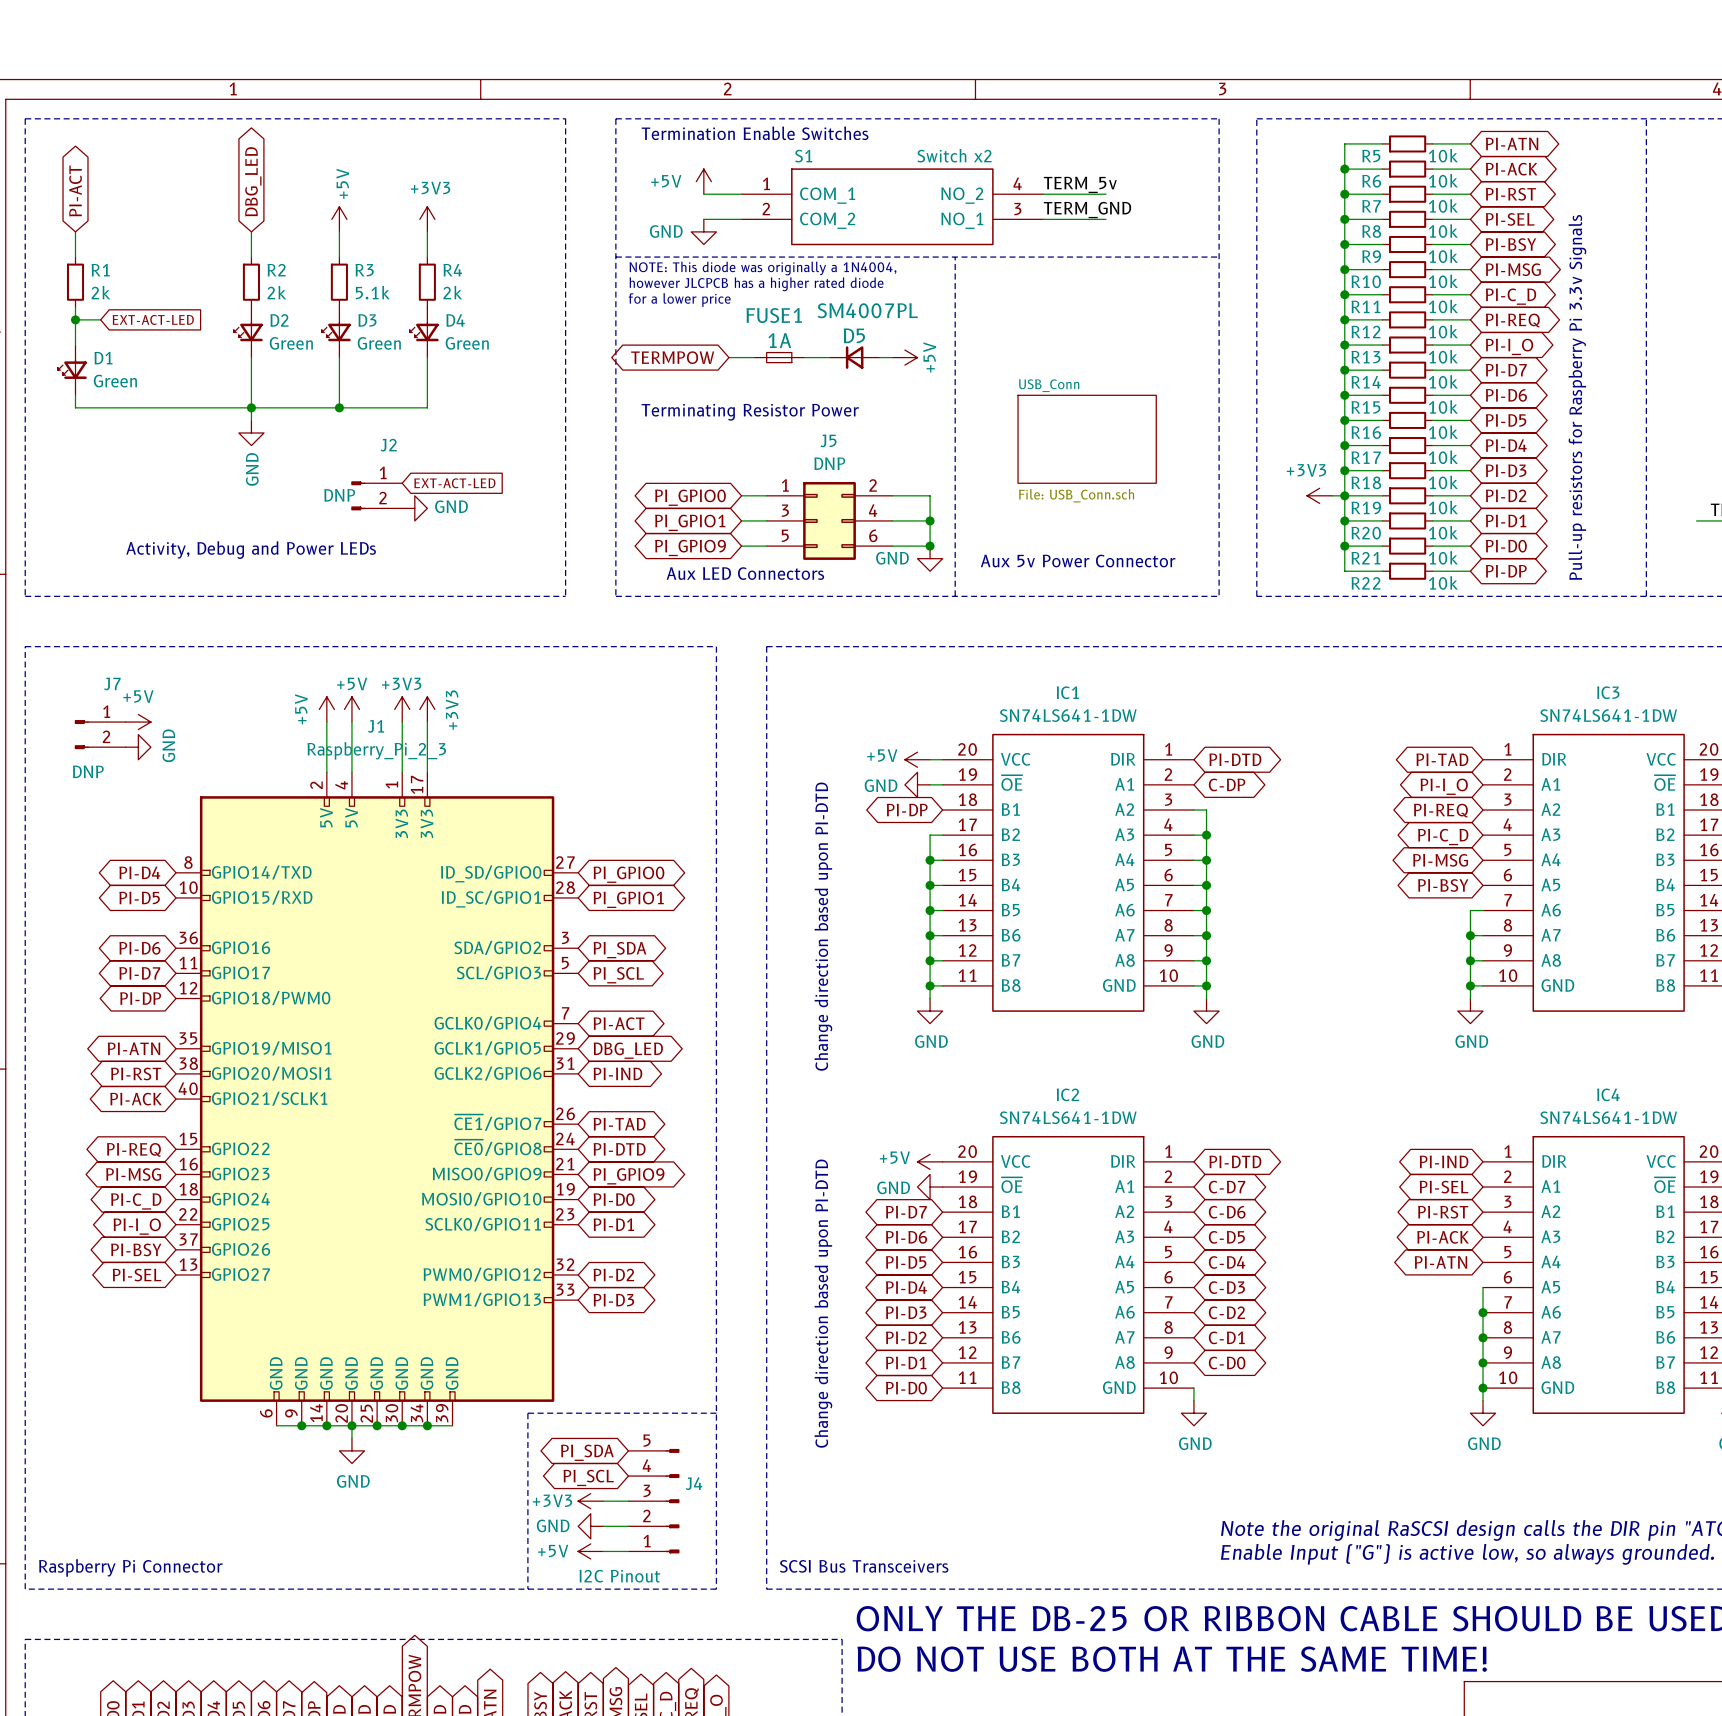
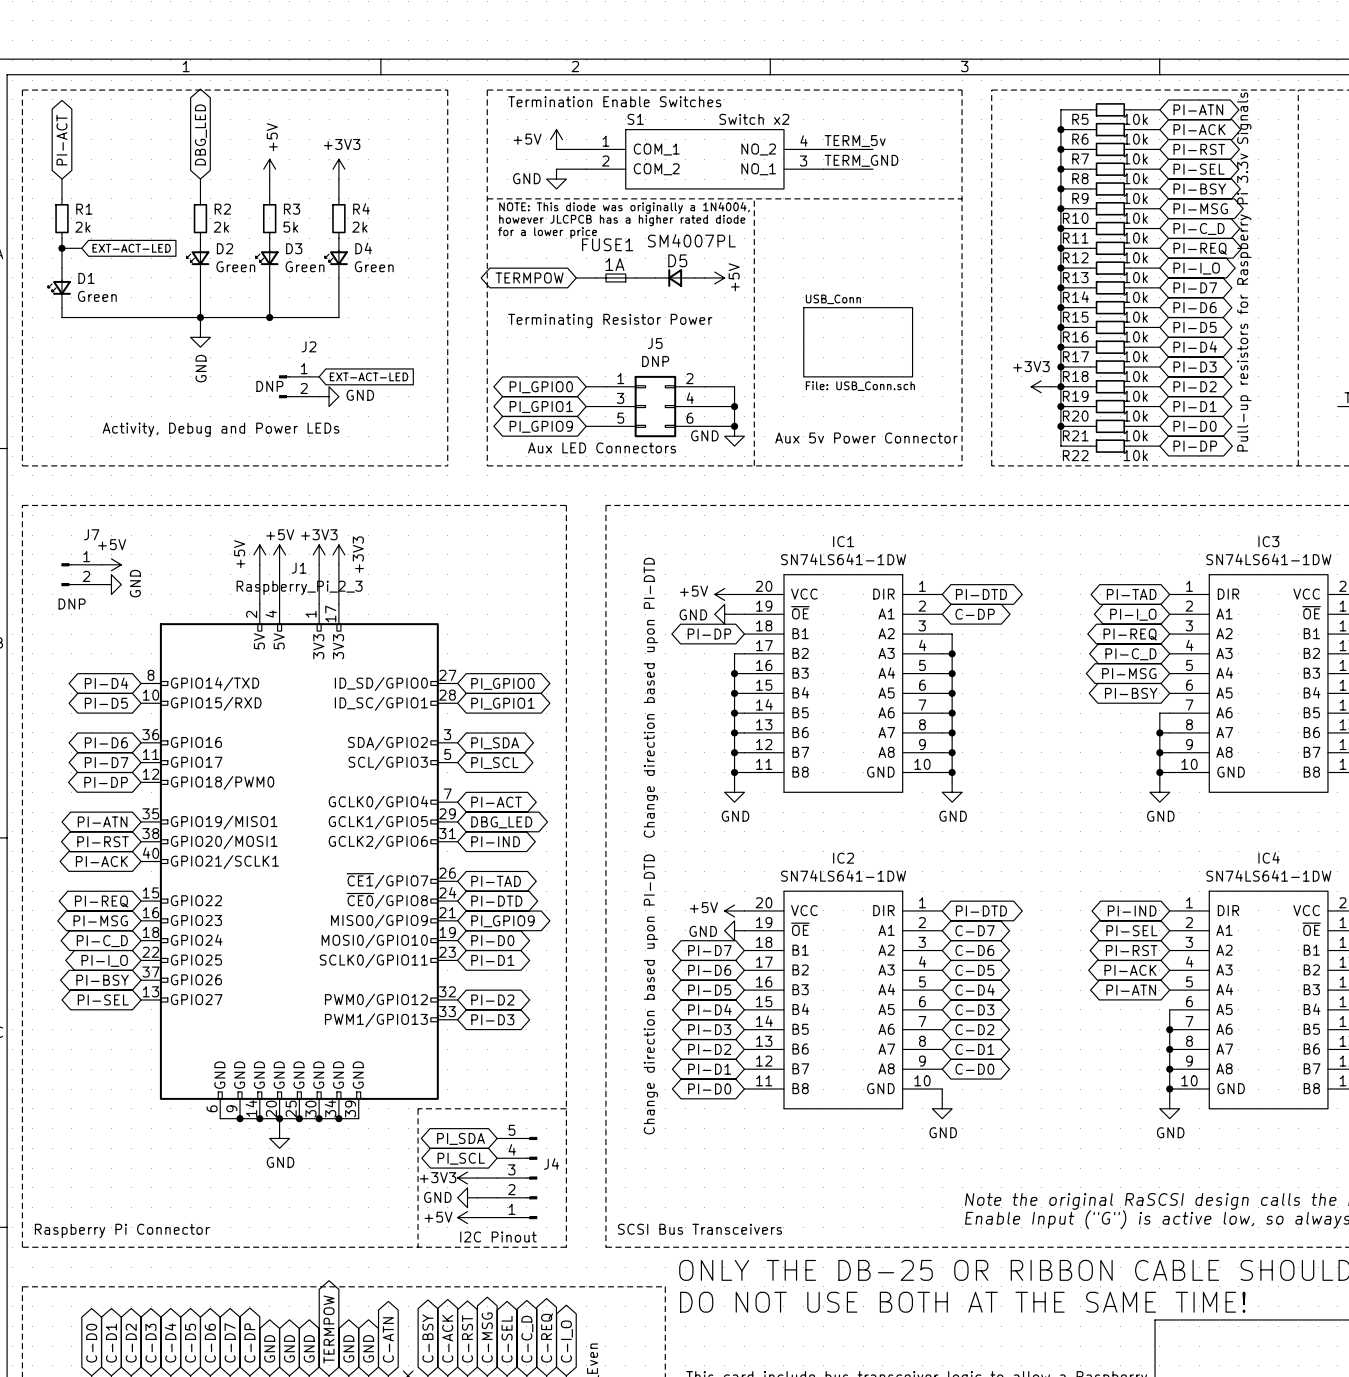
R3 value: 5.1k (372, 292) -> 5k (290, 227)

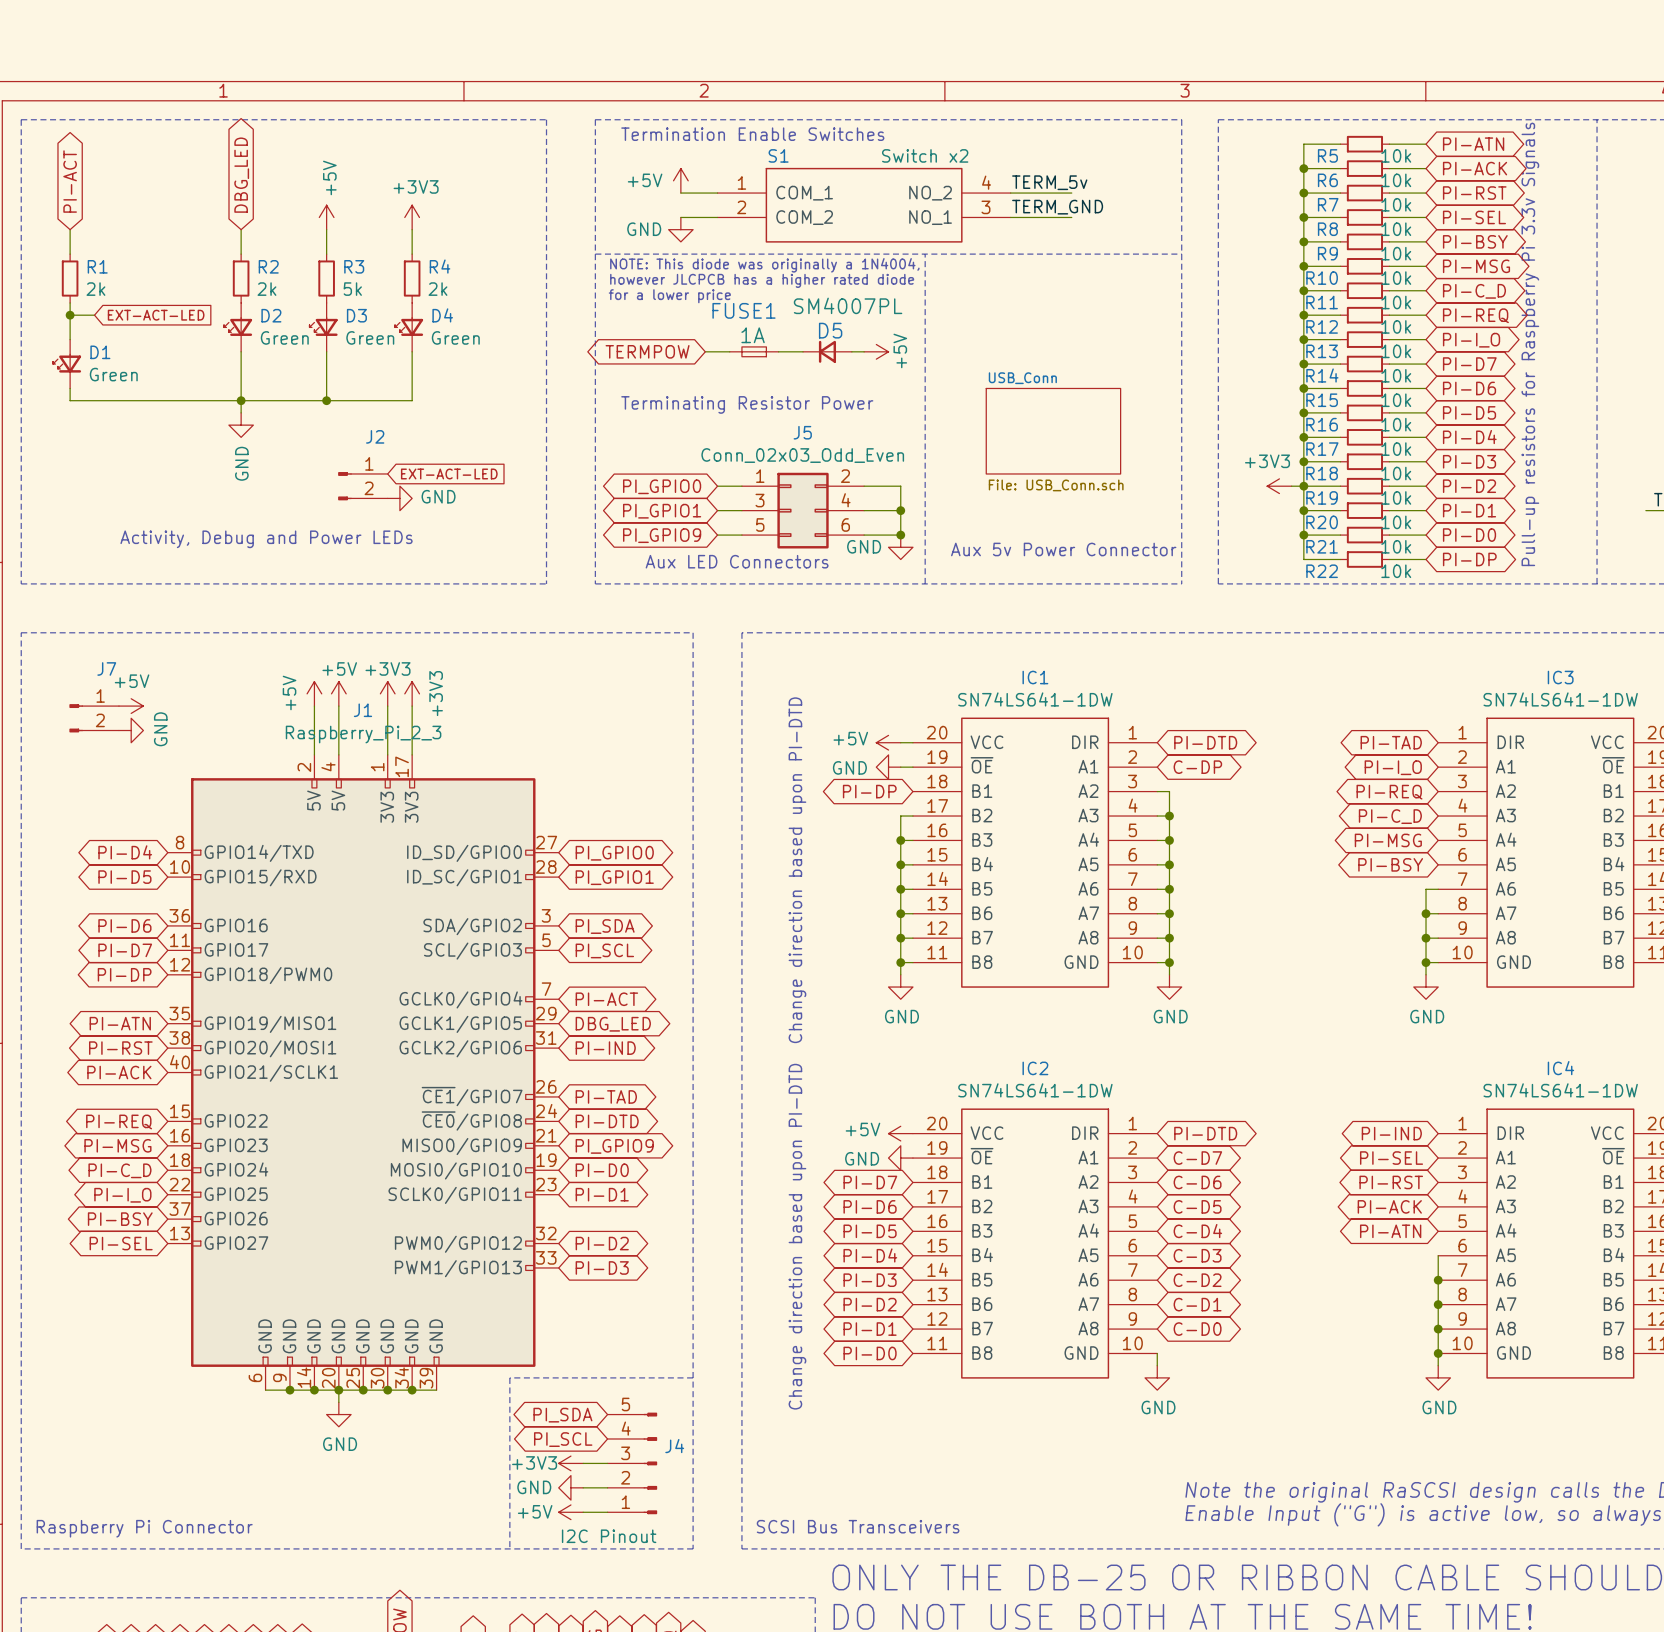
J5 value: DNP (655, 361) -> Conn_02x03_Odd_Even (802, 455)
J2 value: DNP (269, 386) -> none
J7 value: DNP (72, 603) -> none

